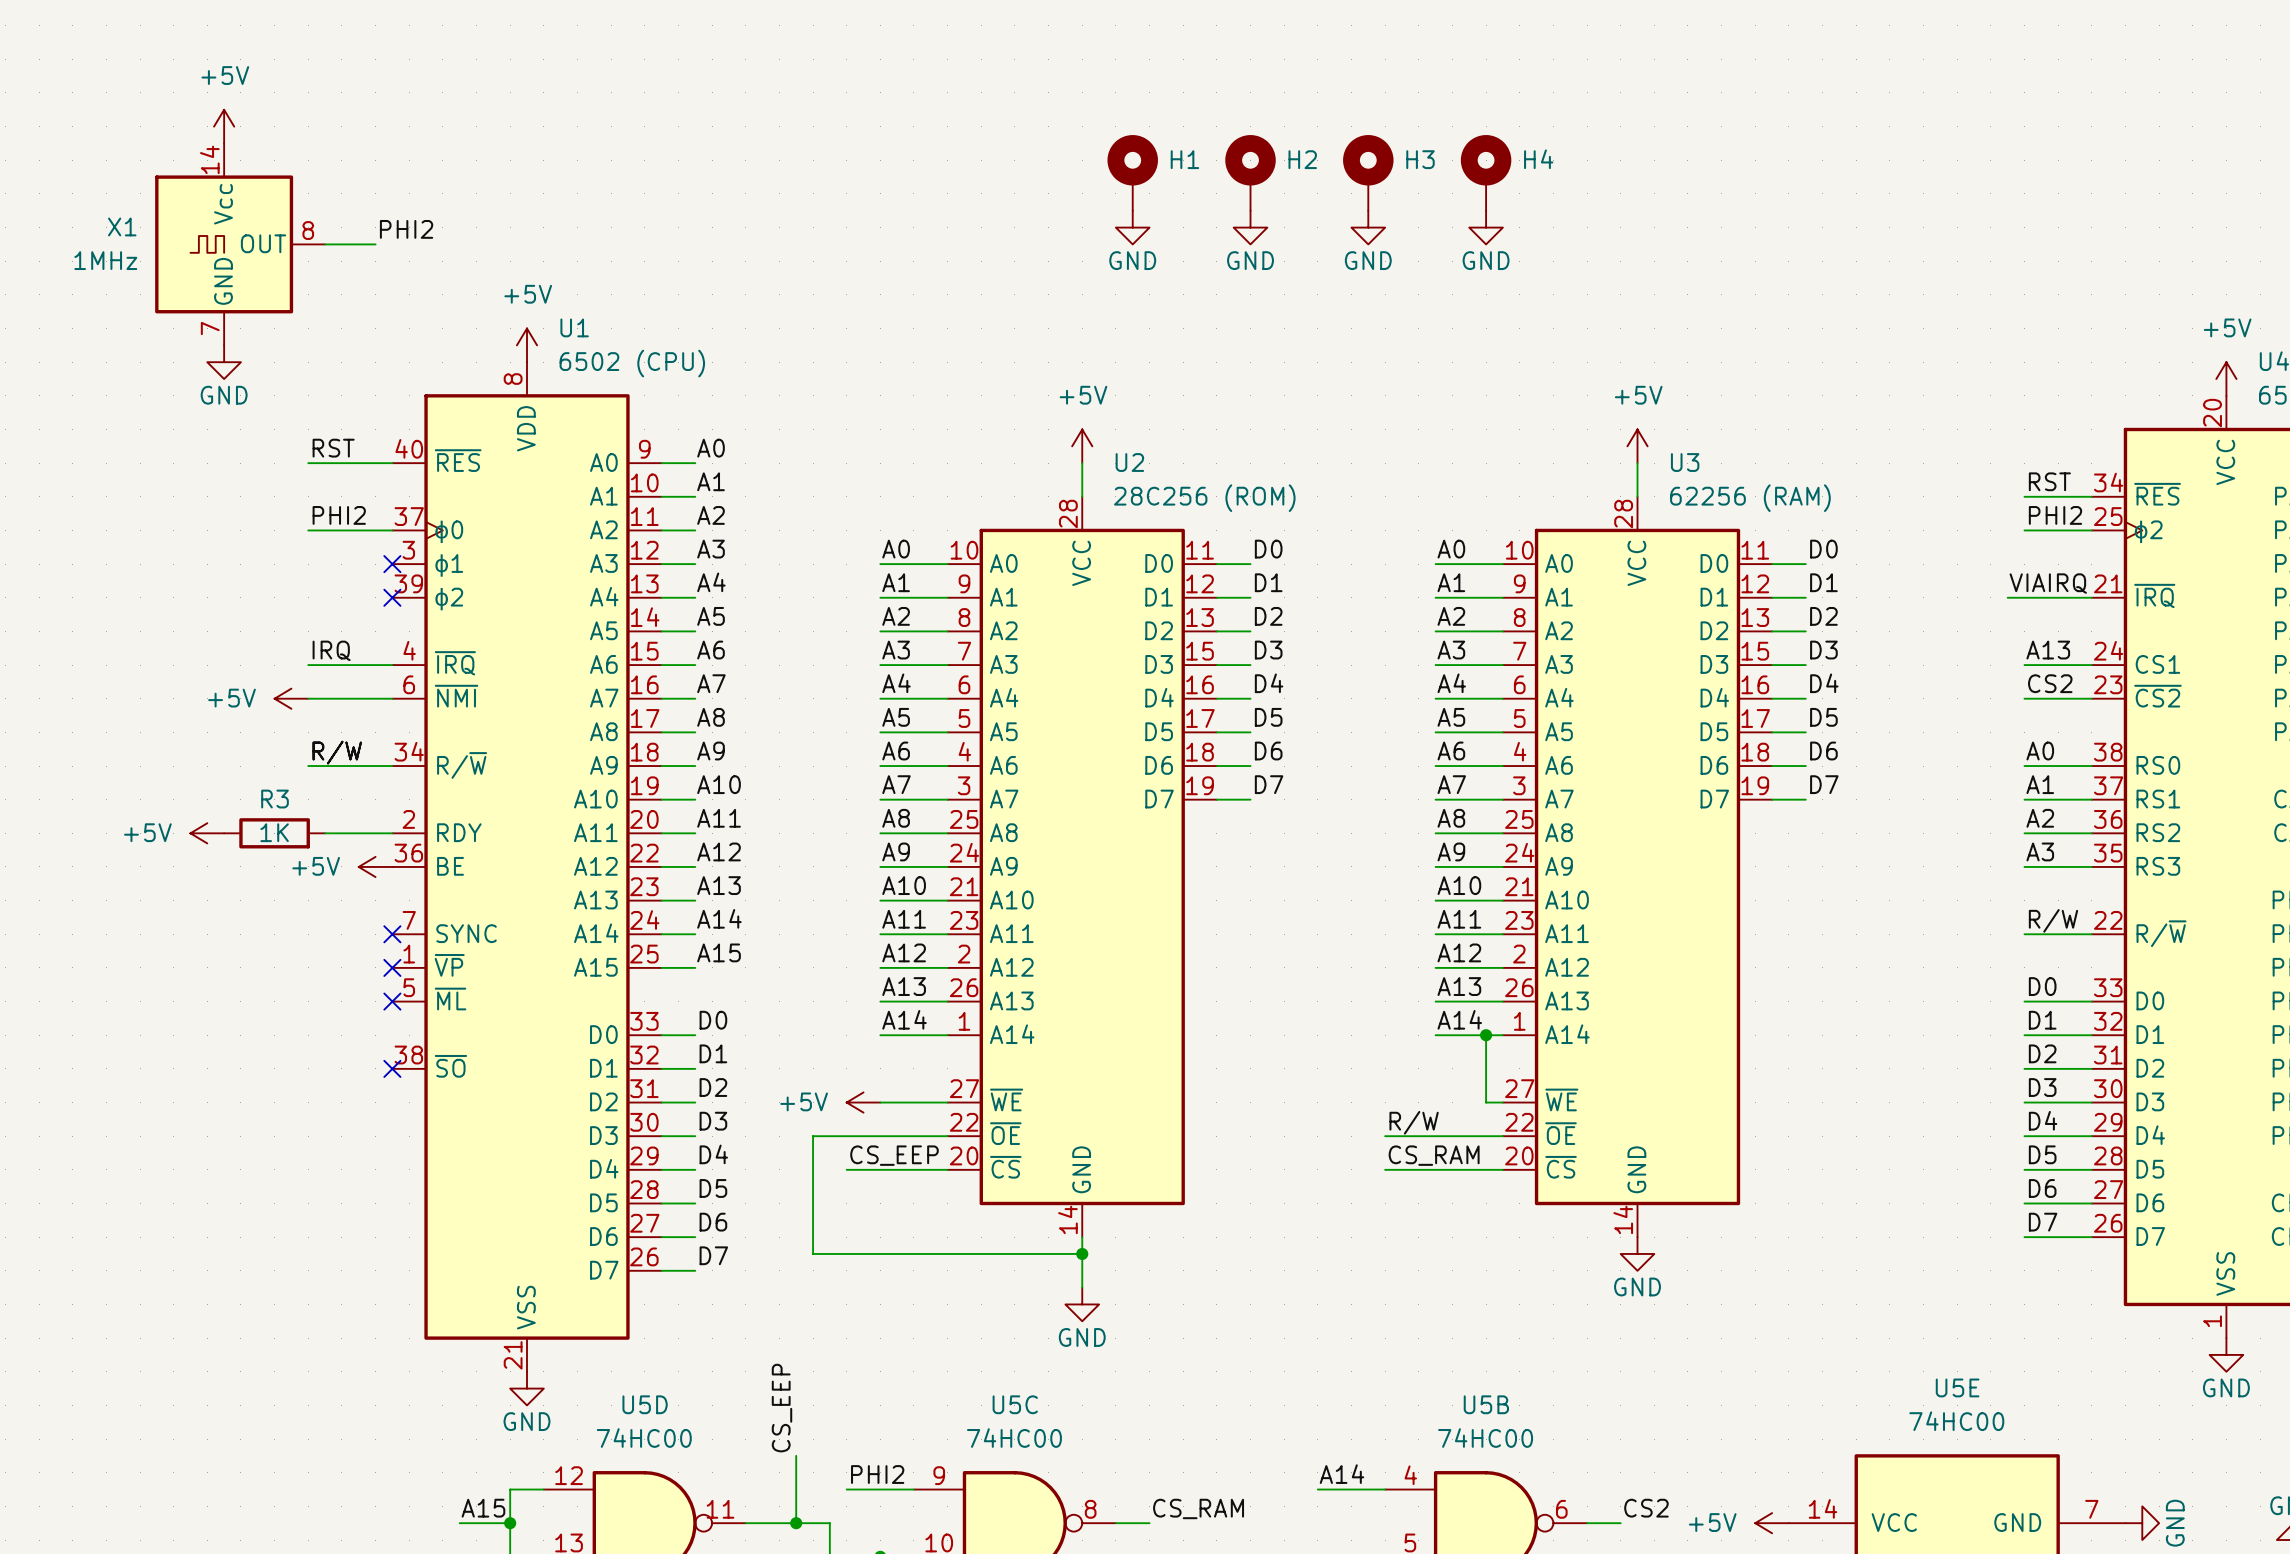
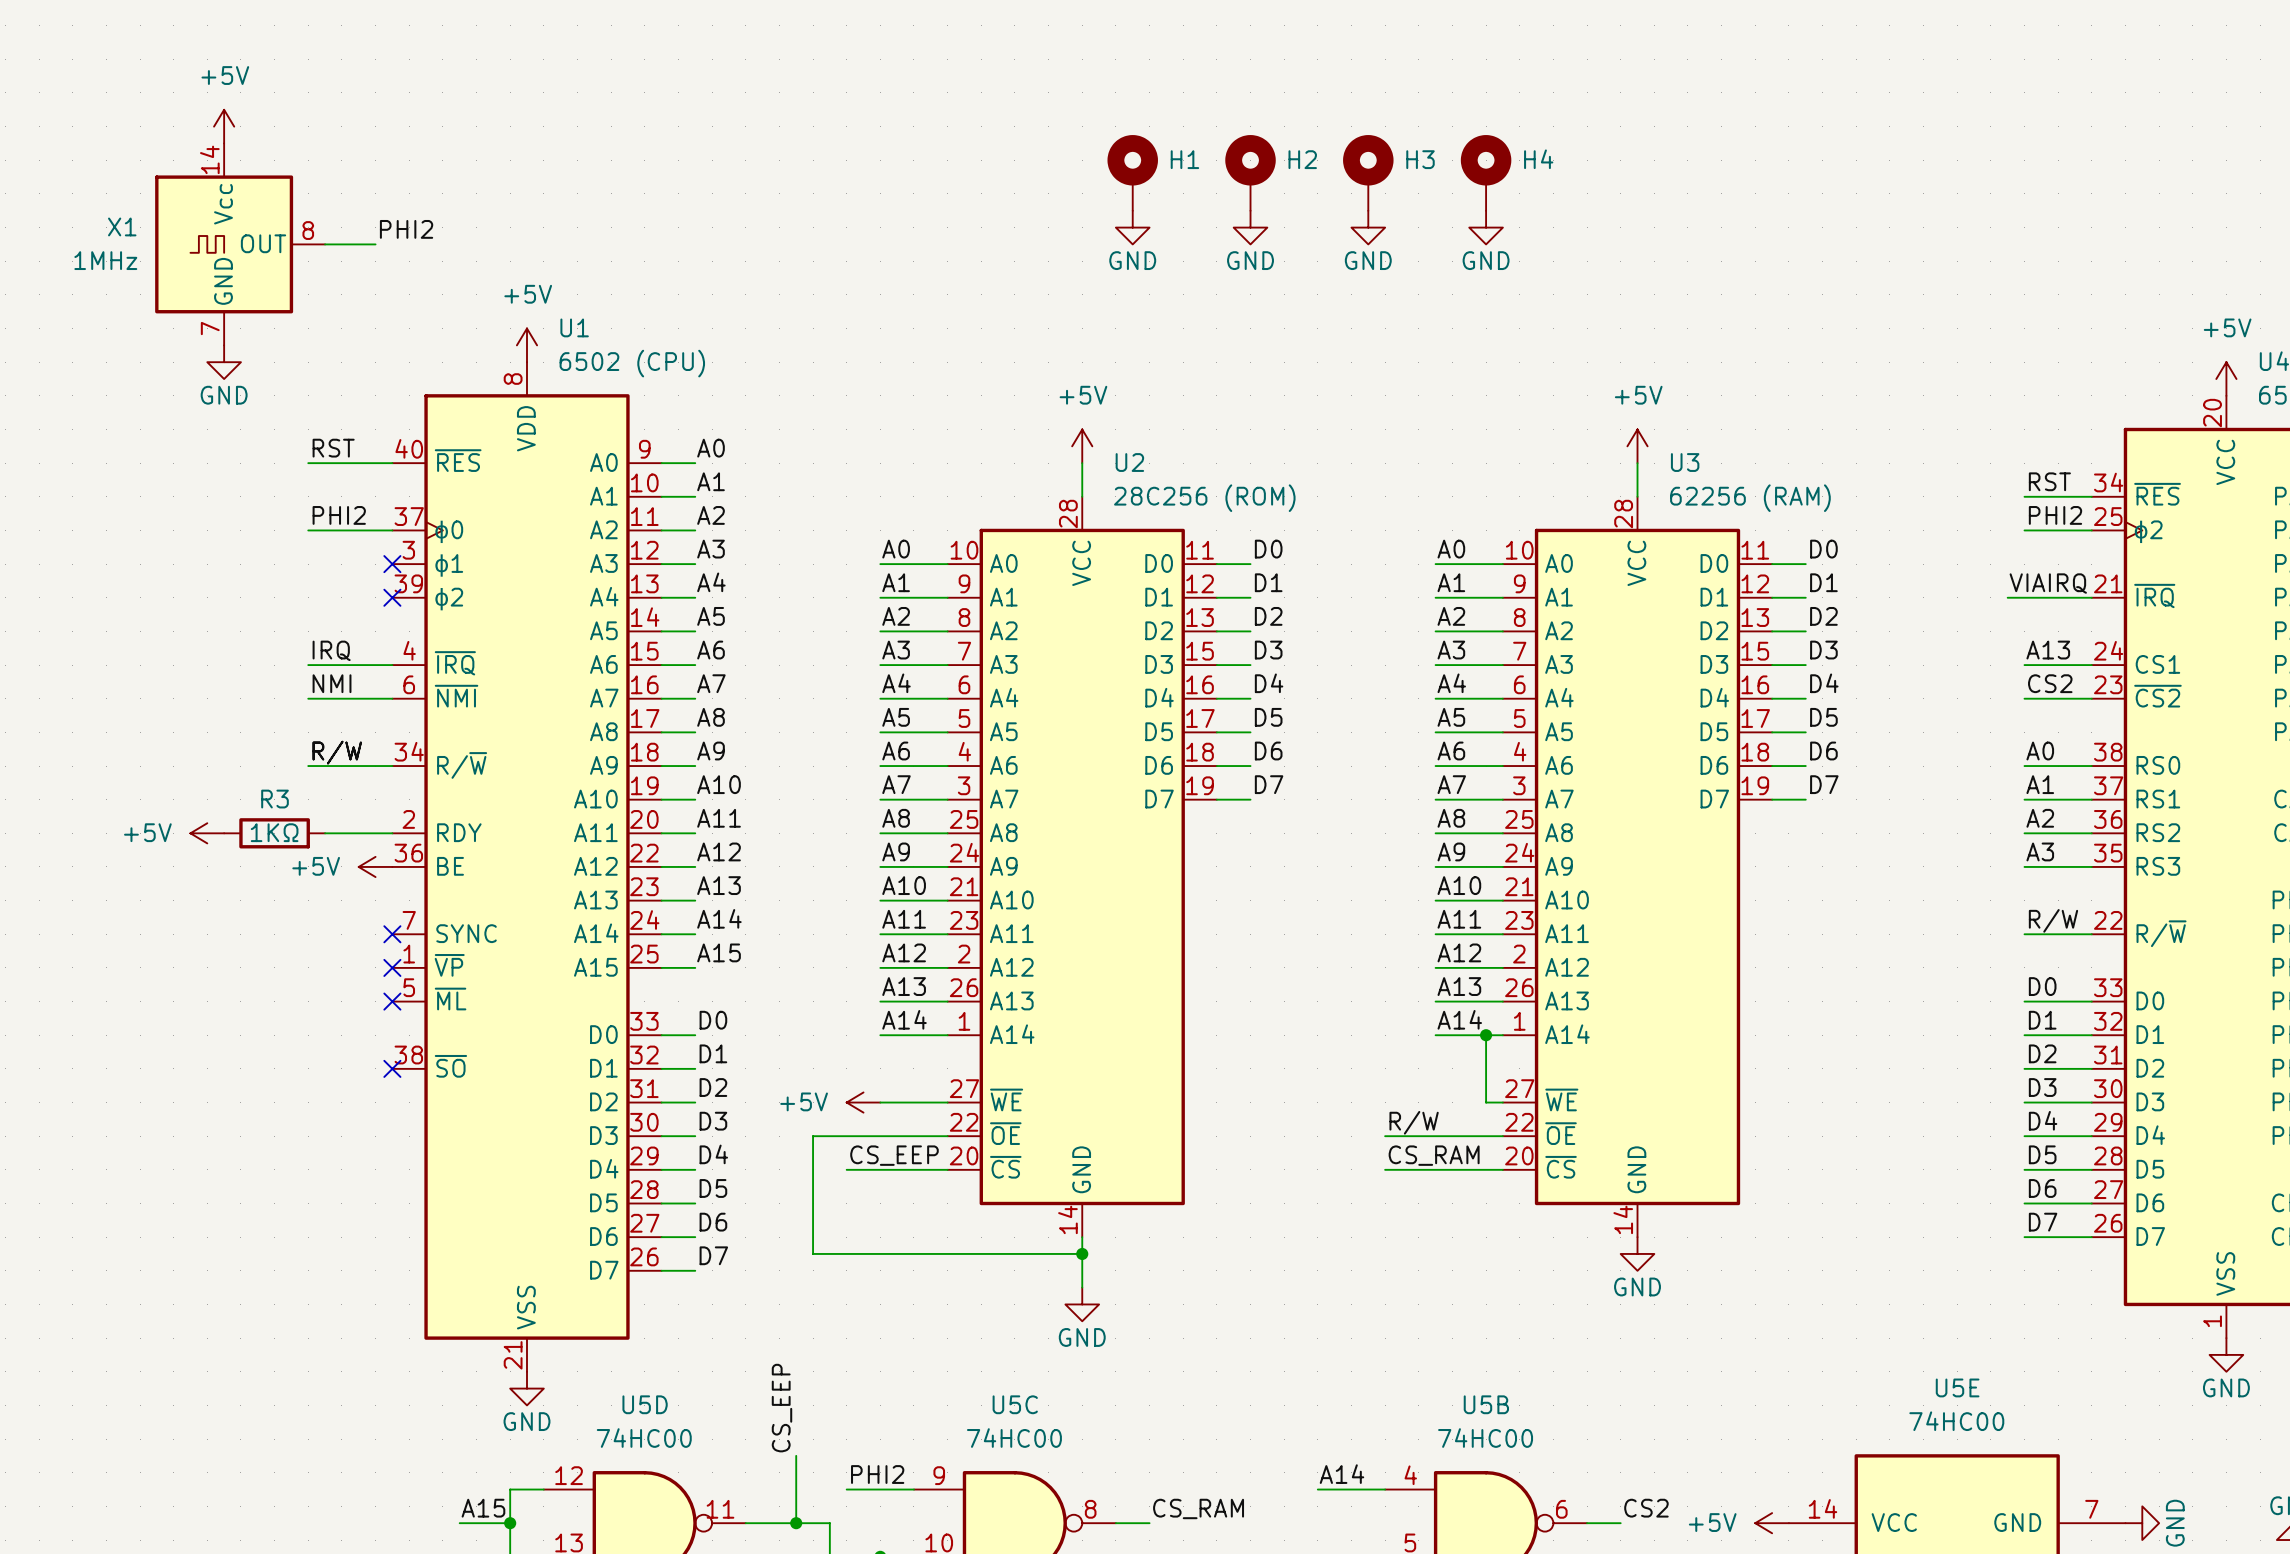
label: none -> NMI (332, 683)
power symbol: +5V (291, 698) -> none
R3 value: 1K (274, 832) -> 1KΩ (274, 832)

